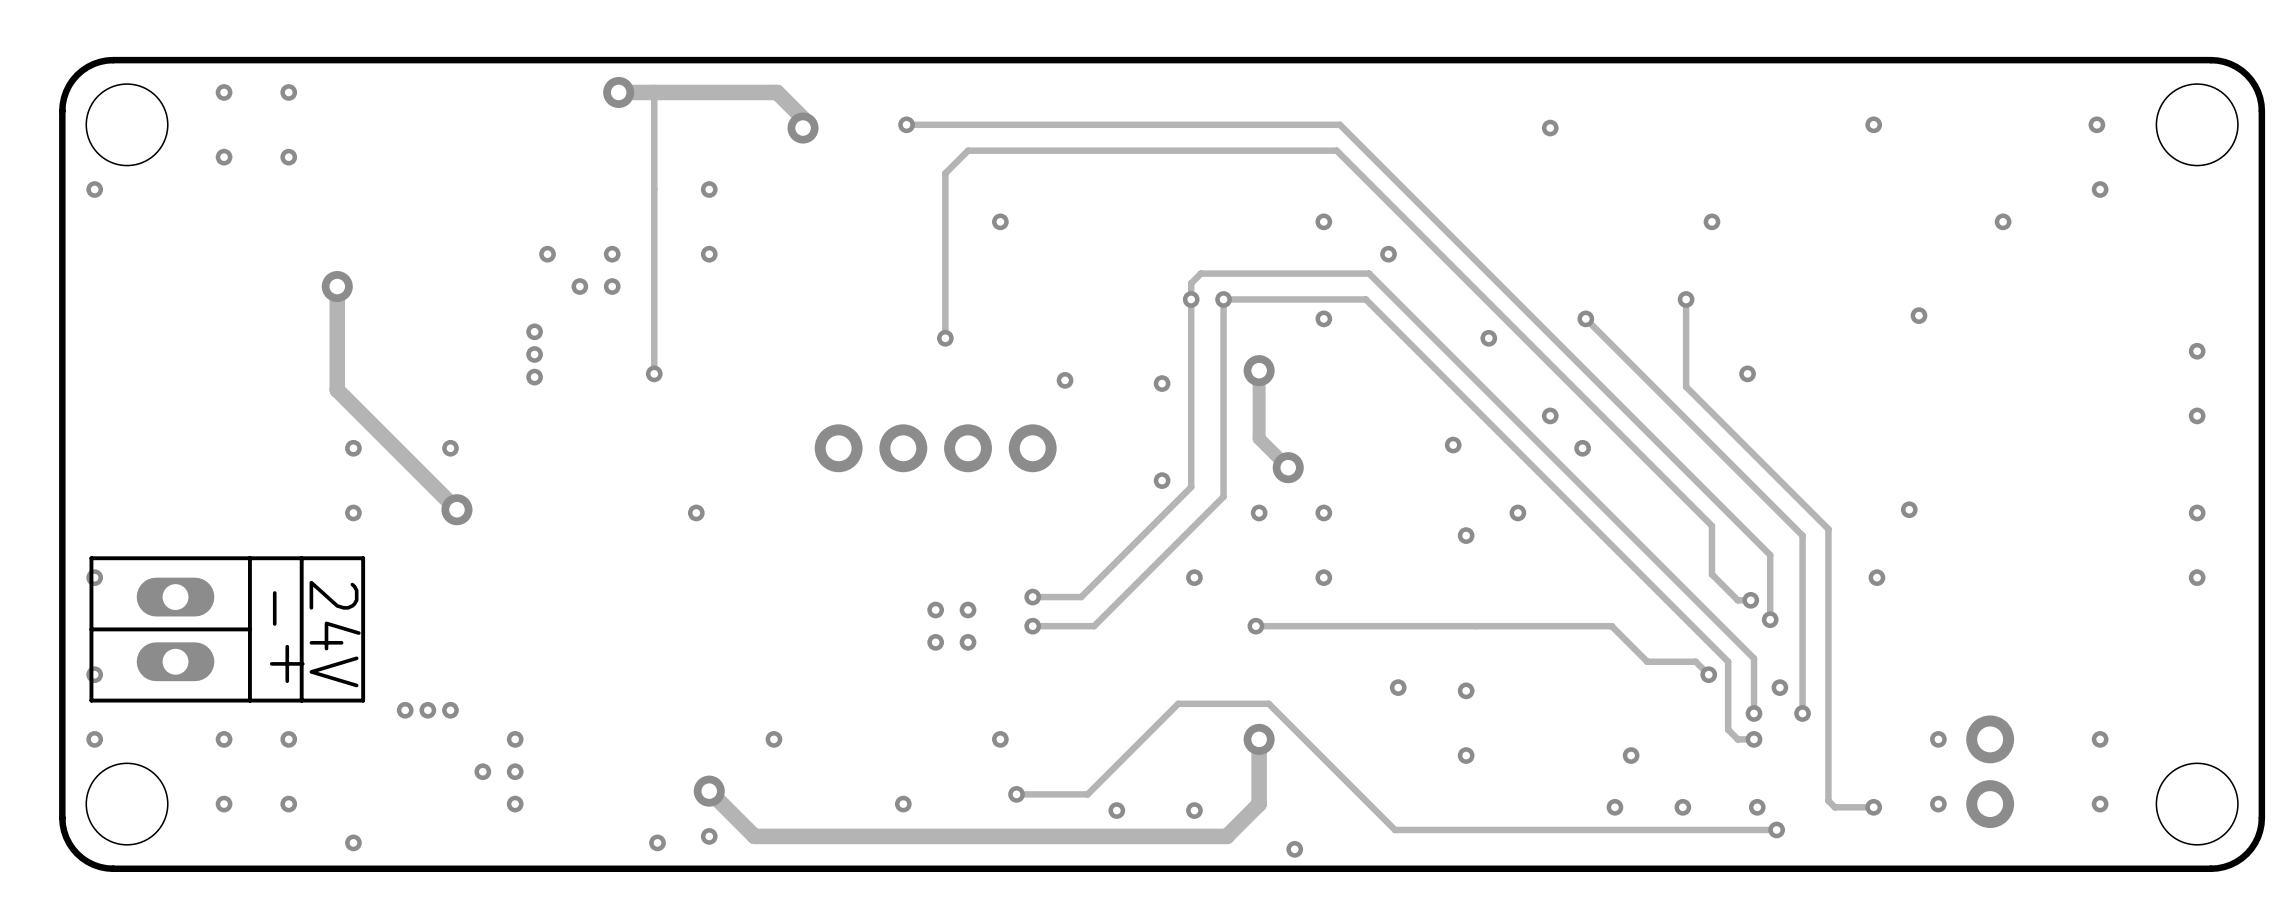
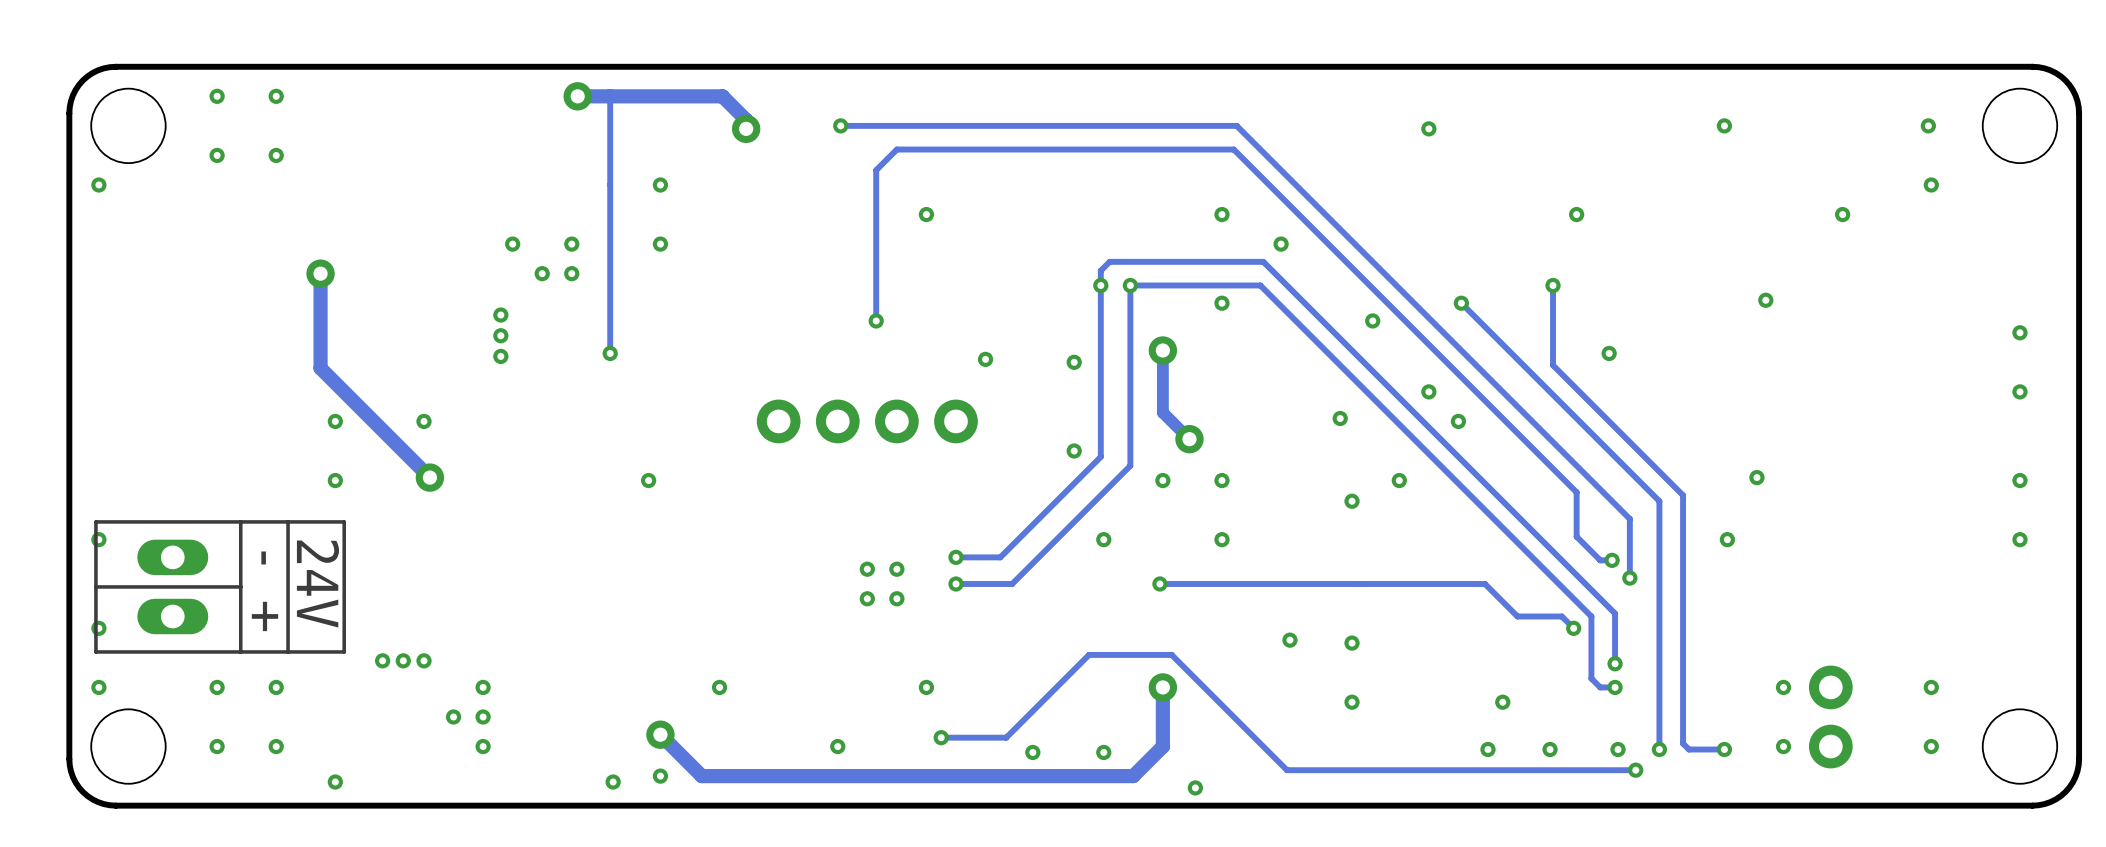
via: (1779, 687) -> none
track: none -> (1659, 663) (1659, 749)
via: (1802, 713) -> none
via: none -> (1659, 749)

